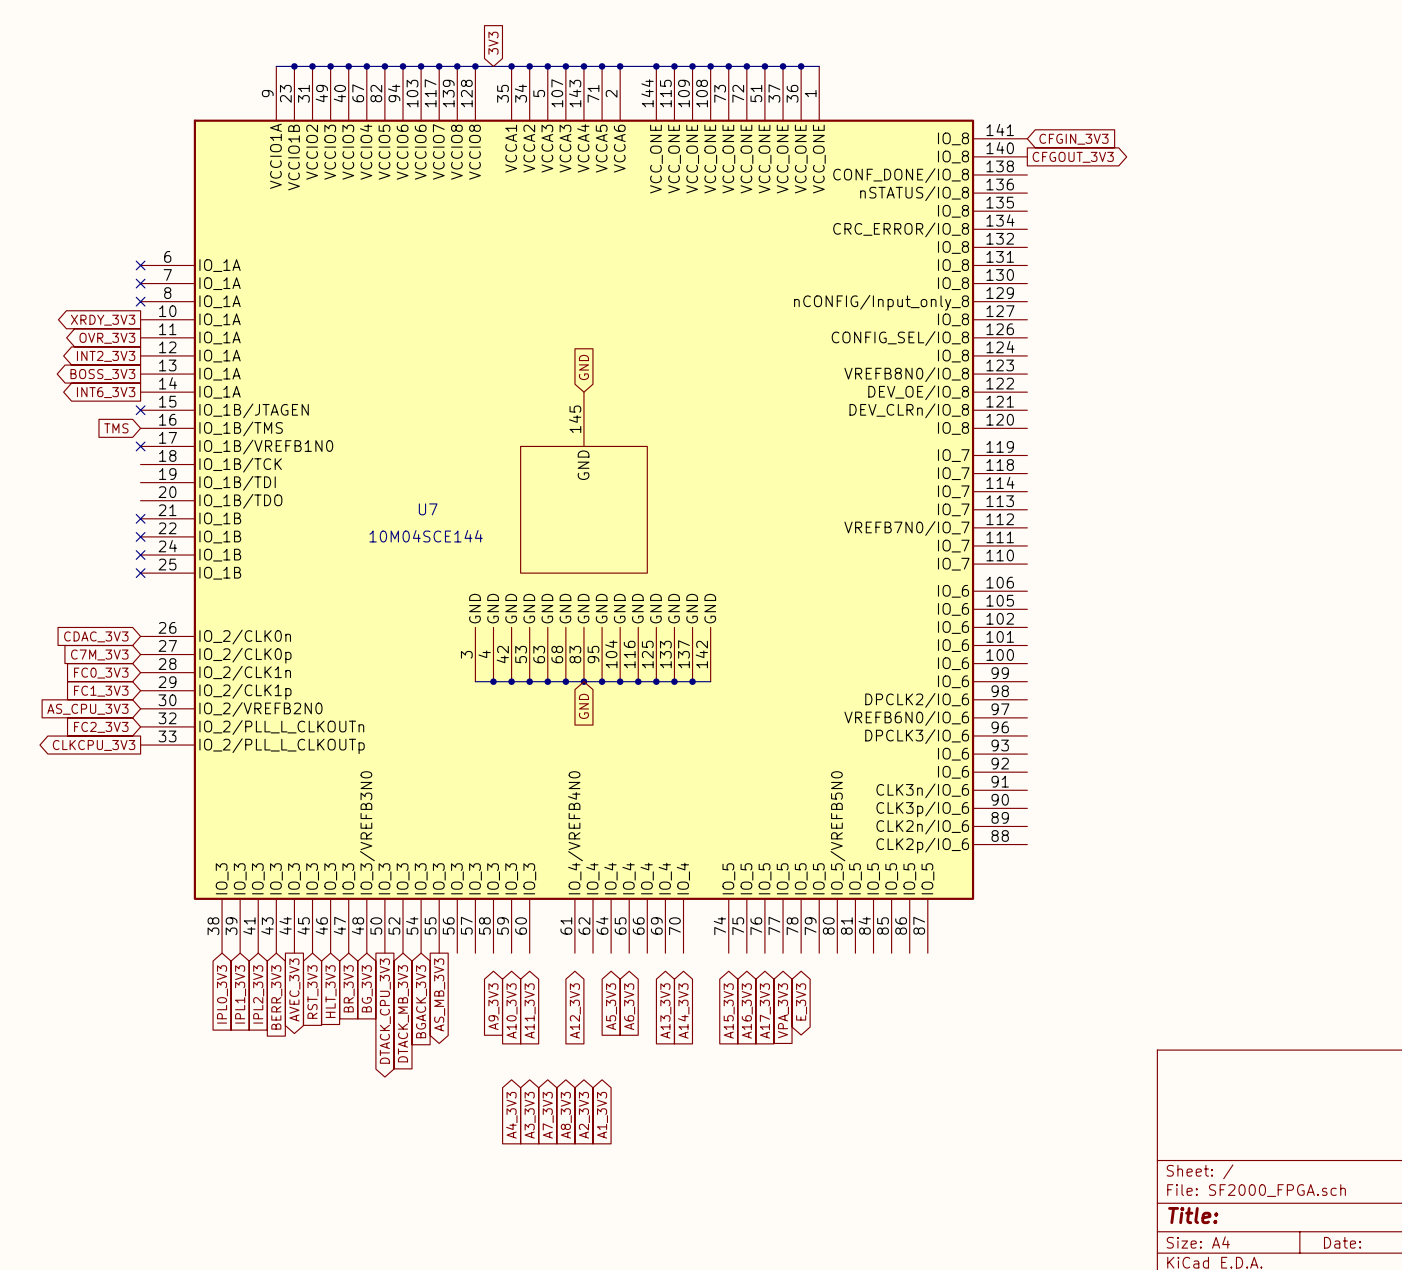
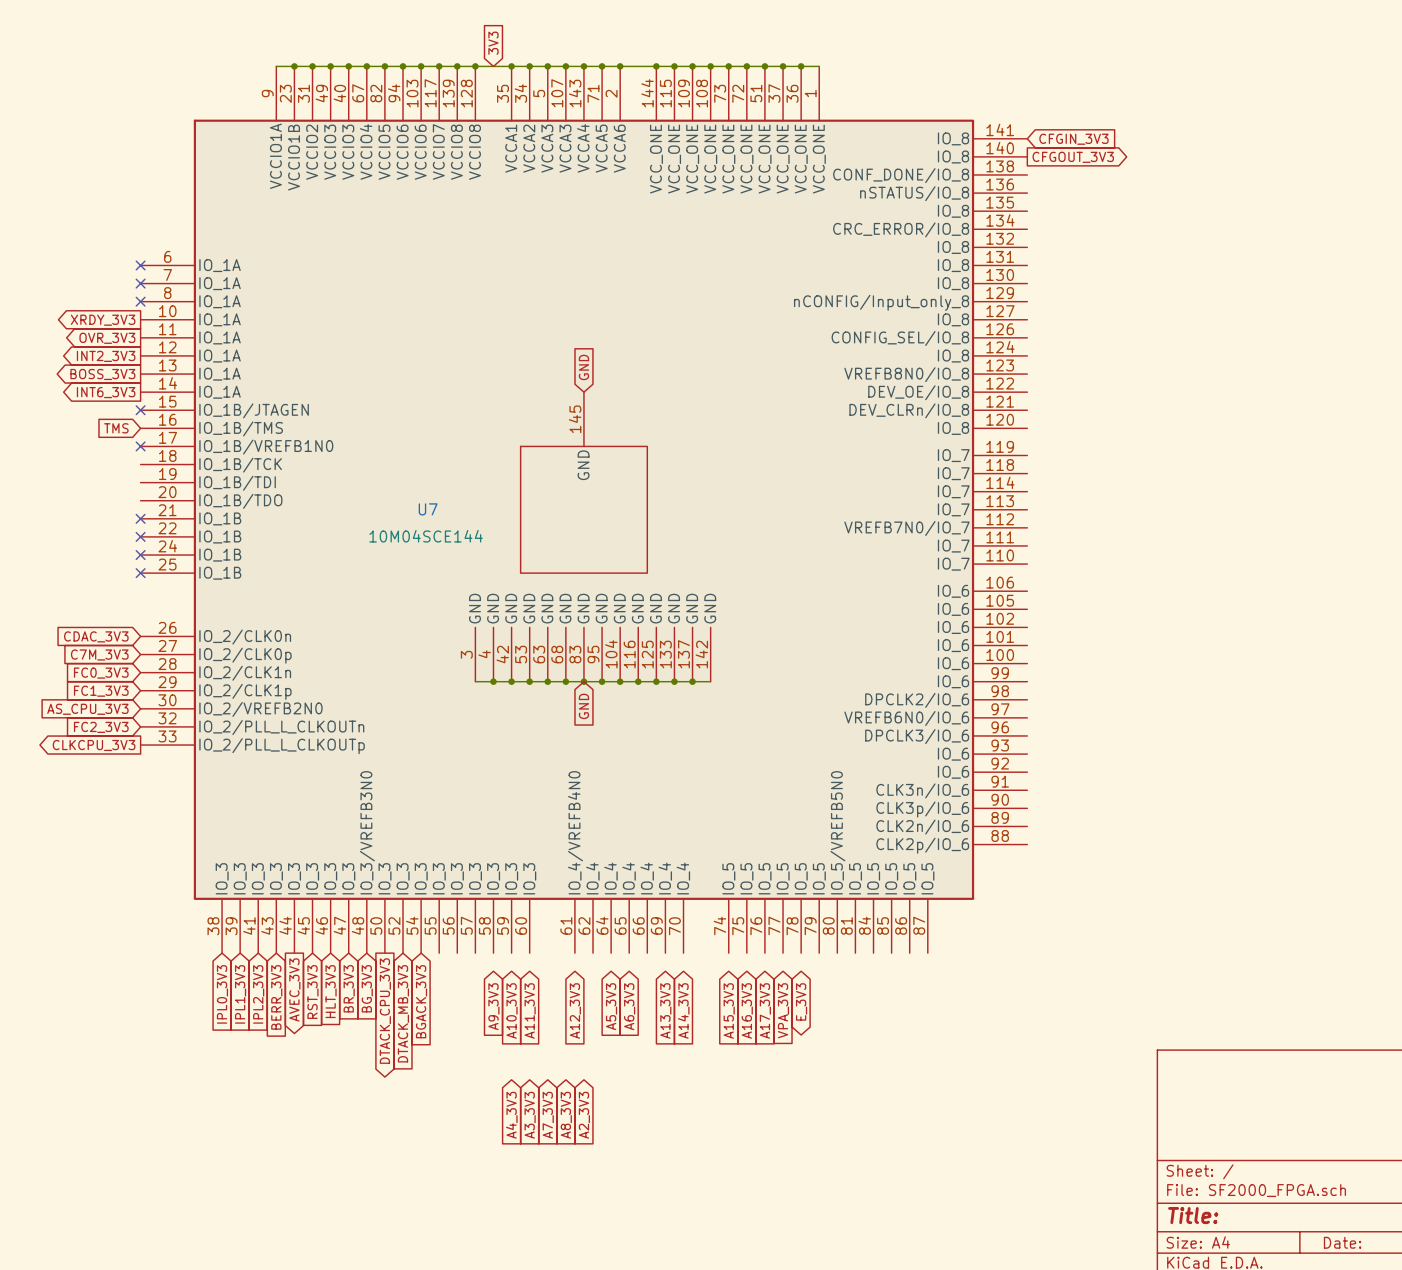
global label: AS_MB_3V3 (439, 994) -> none
global label: A1_3V3 (602, 1115) -> none

